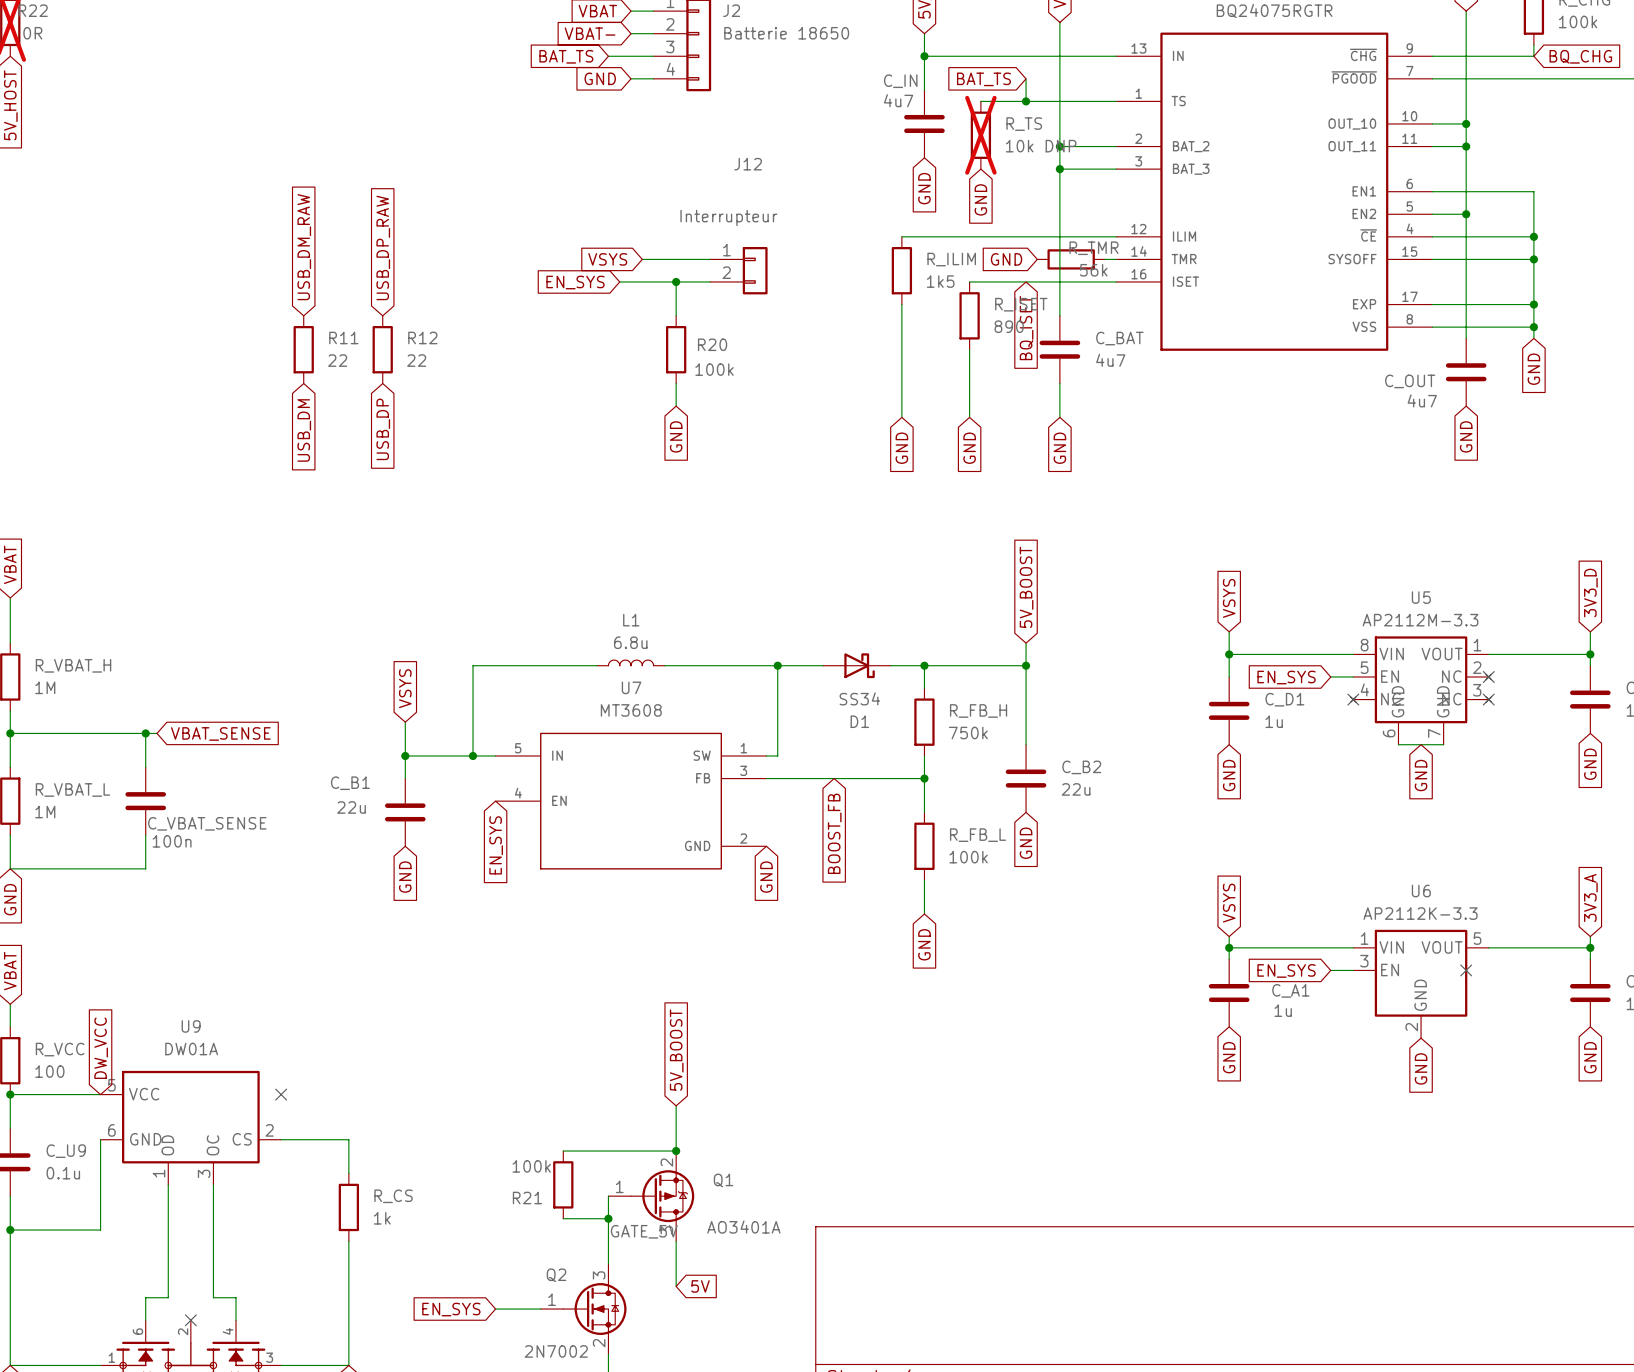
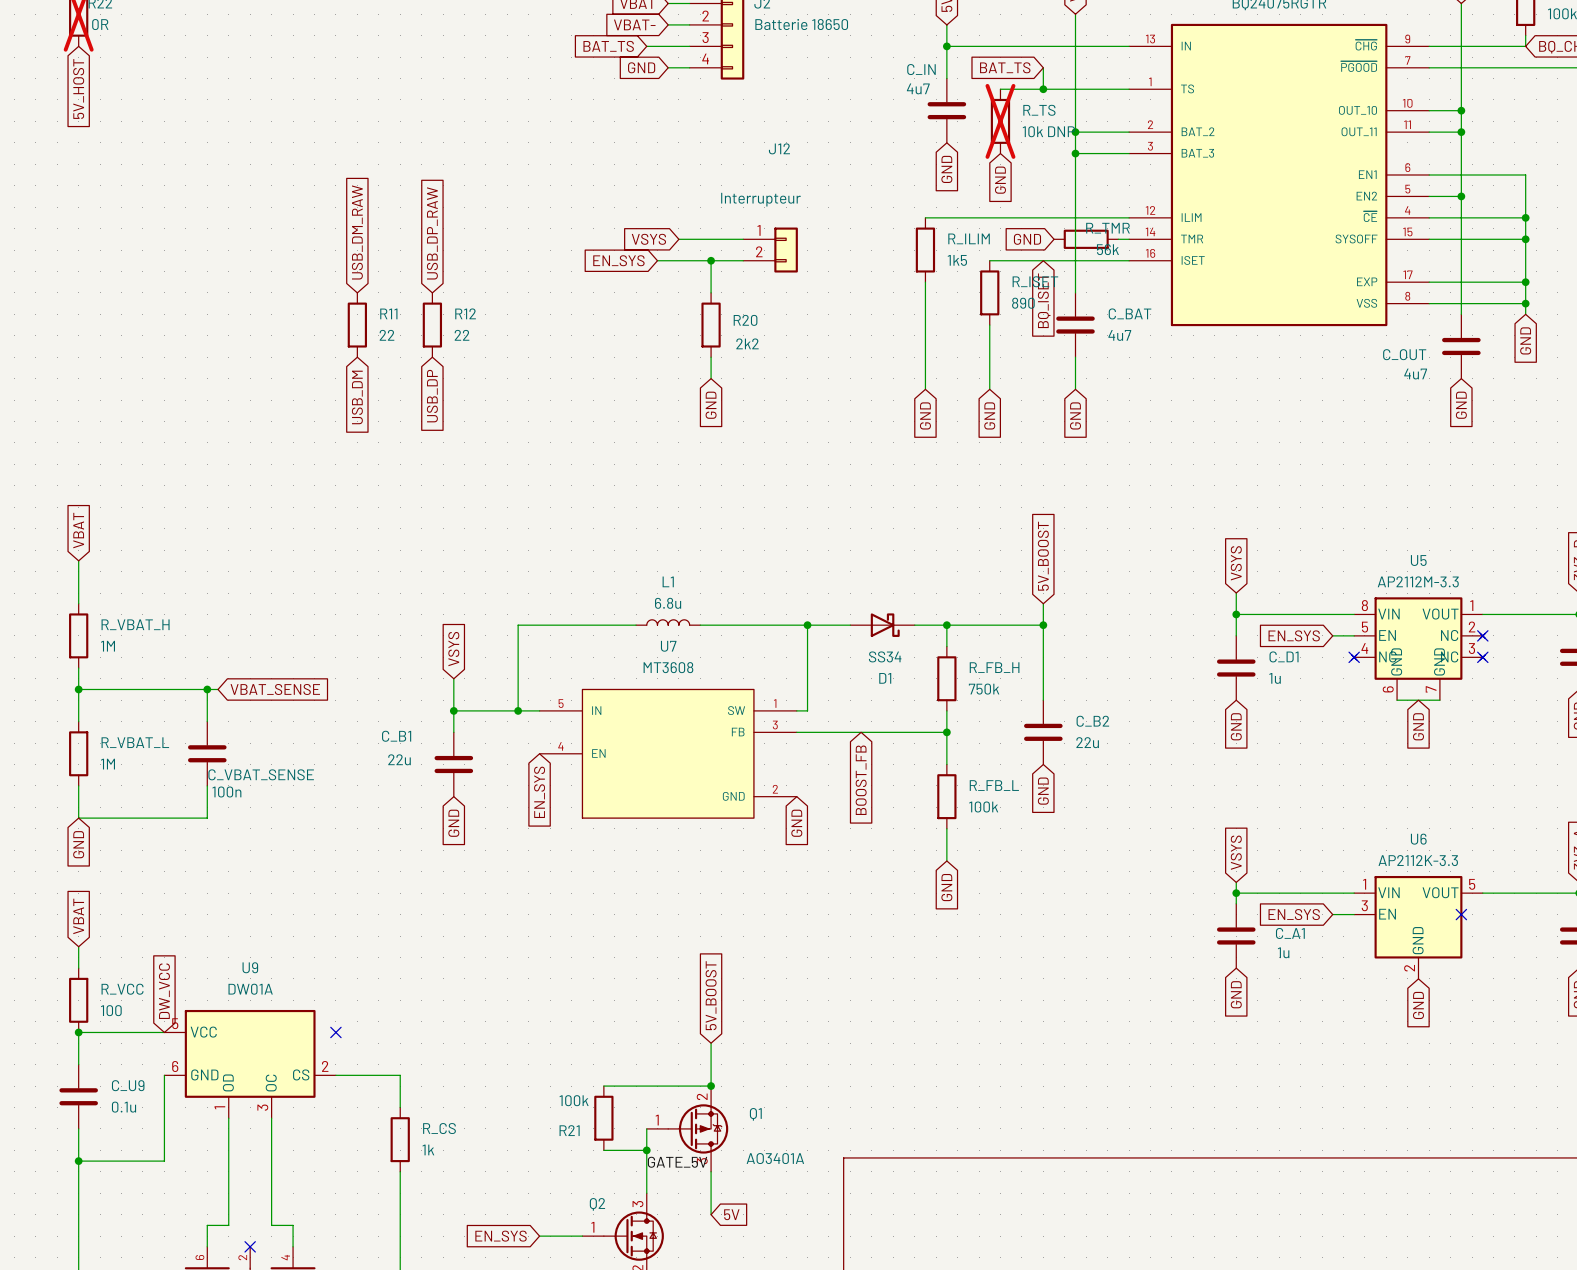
R20 value: 100k (714, 369) -> 2k2 (747, 343)

